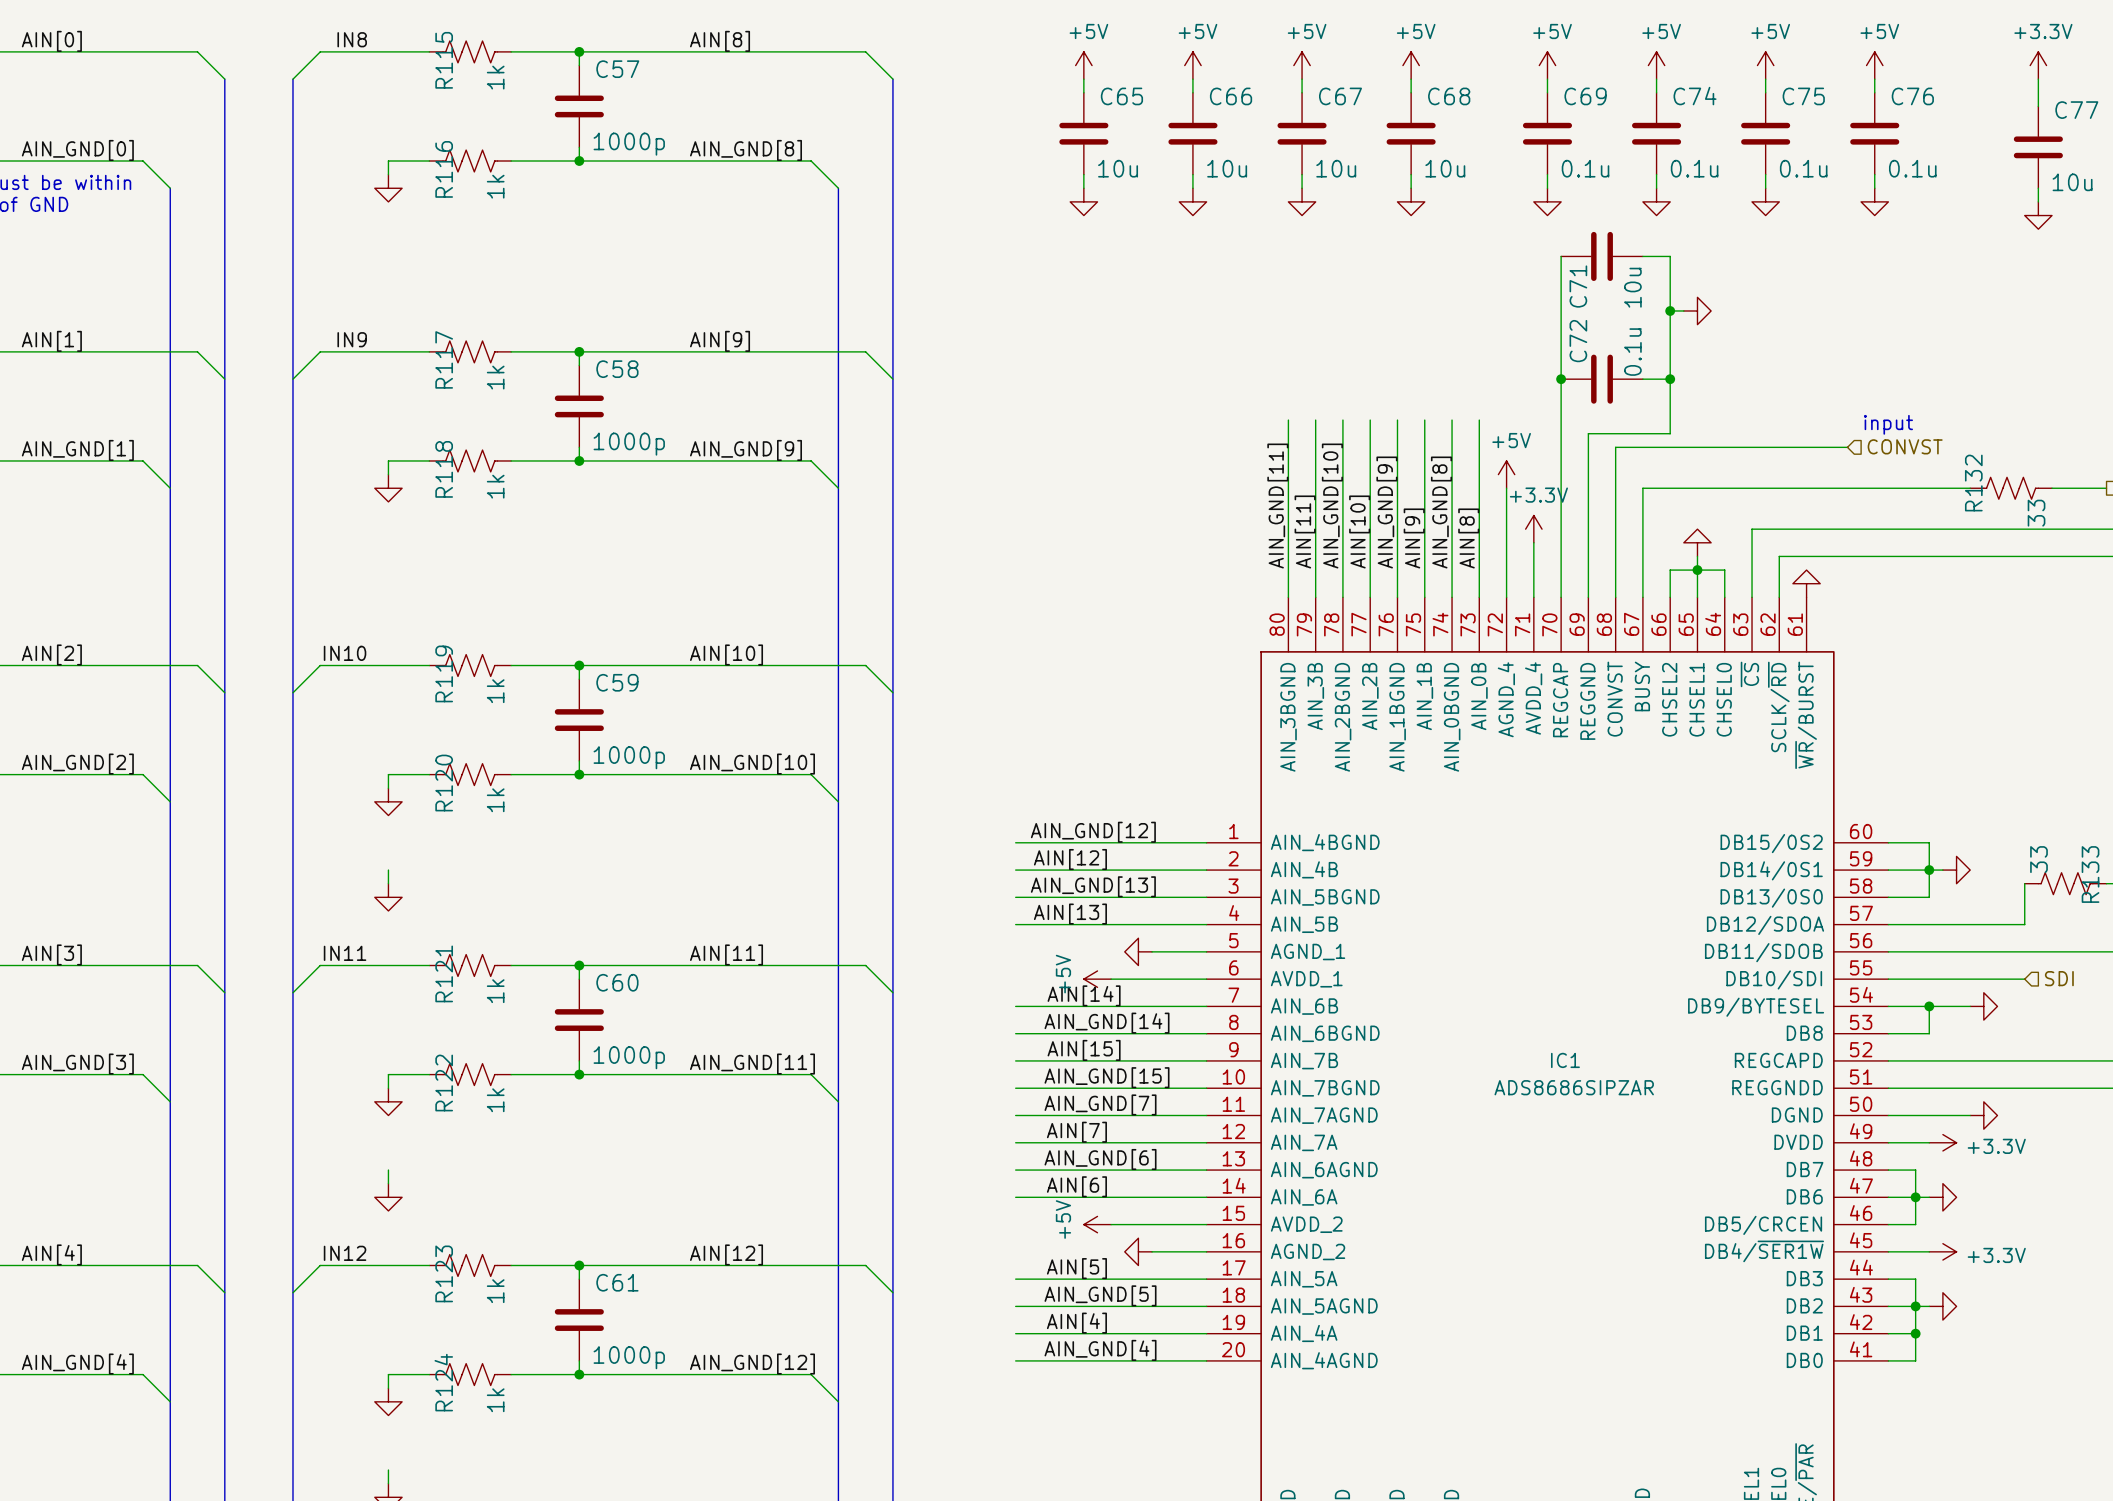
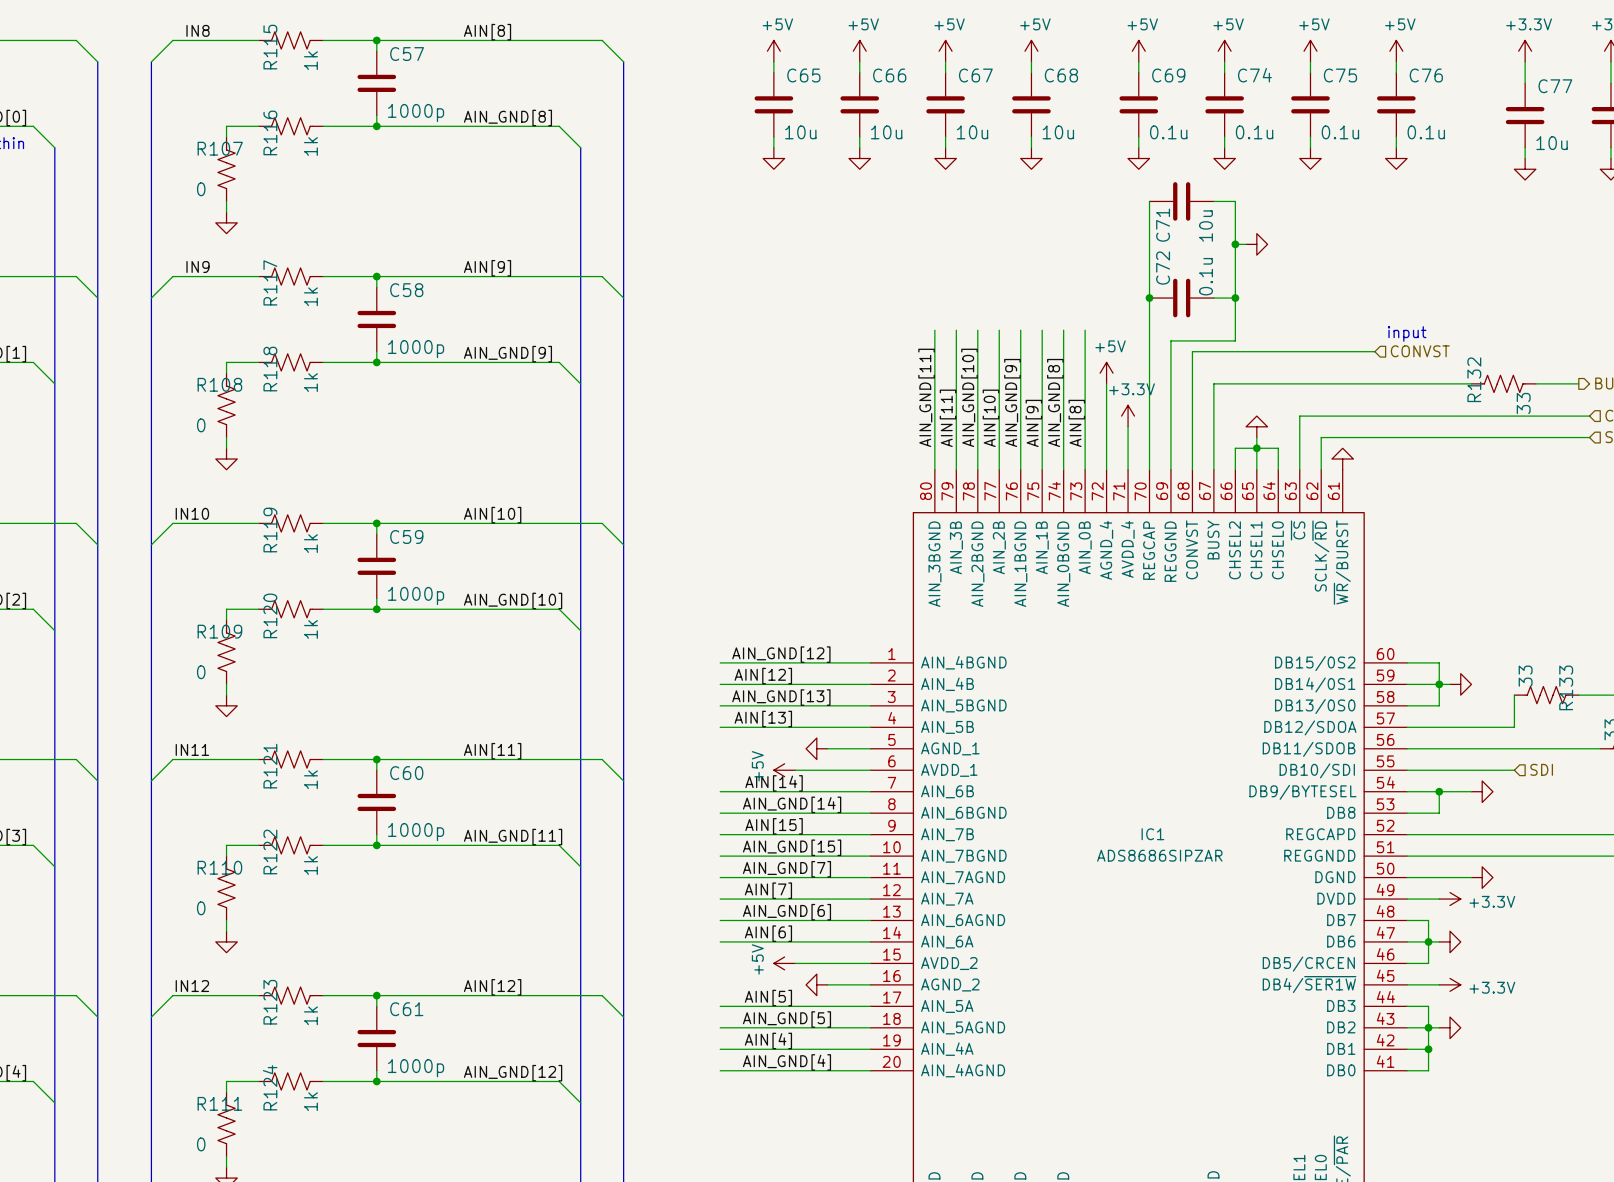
power symbol position: (388, 188) -> (226, 222)
R107: none -> 0 (226, 169)
wire: none -> (226, 201) (226, 212)
power symbol position: (388, 488) -> (226, 459)
R108: none -> 0 (226, 405)
wire: none -> (226, 437) (226, 448)
power symbol: (388, 801) -> none
R109: none -> 0 (226, 652)
power symbol: (388, 1101) -> none
R110: none -> 0 (226, 888)
power symbol: (388, 1401) -> none
R111: none -> 0 (226, 1124)

